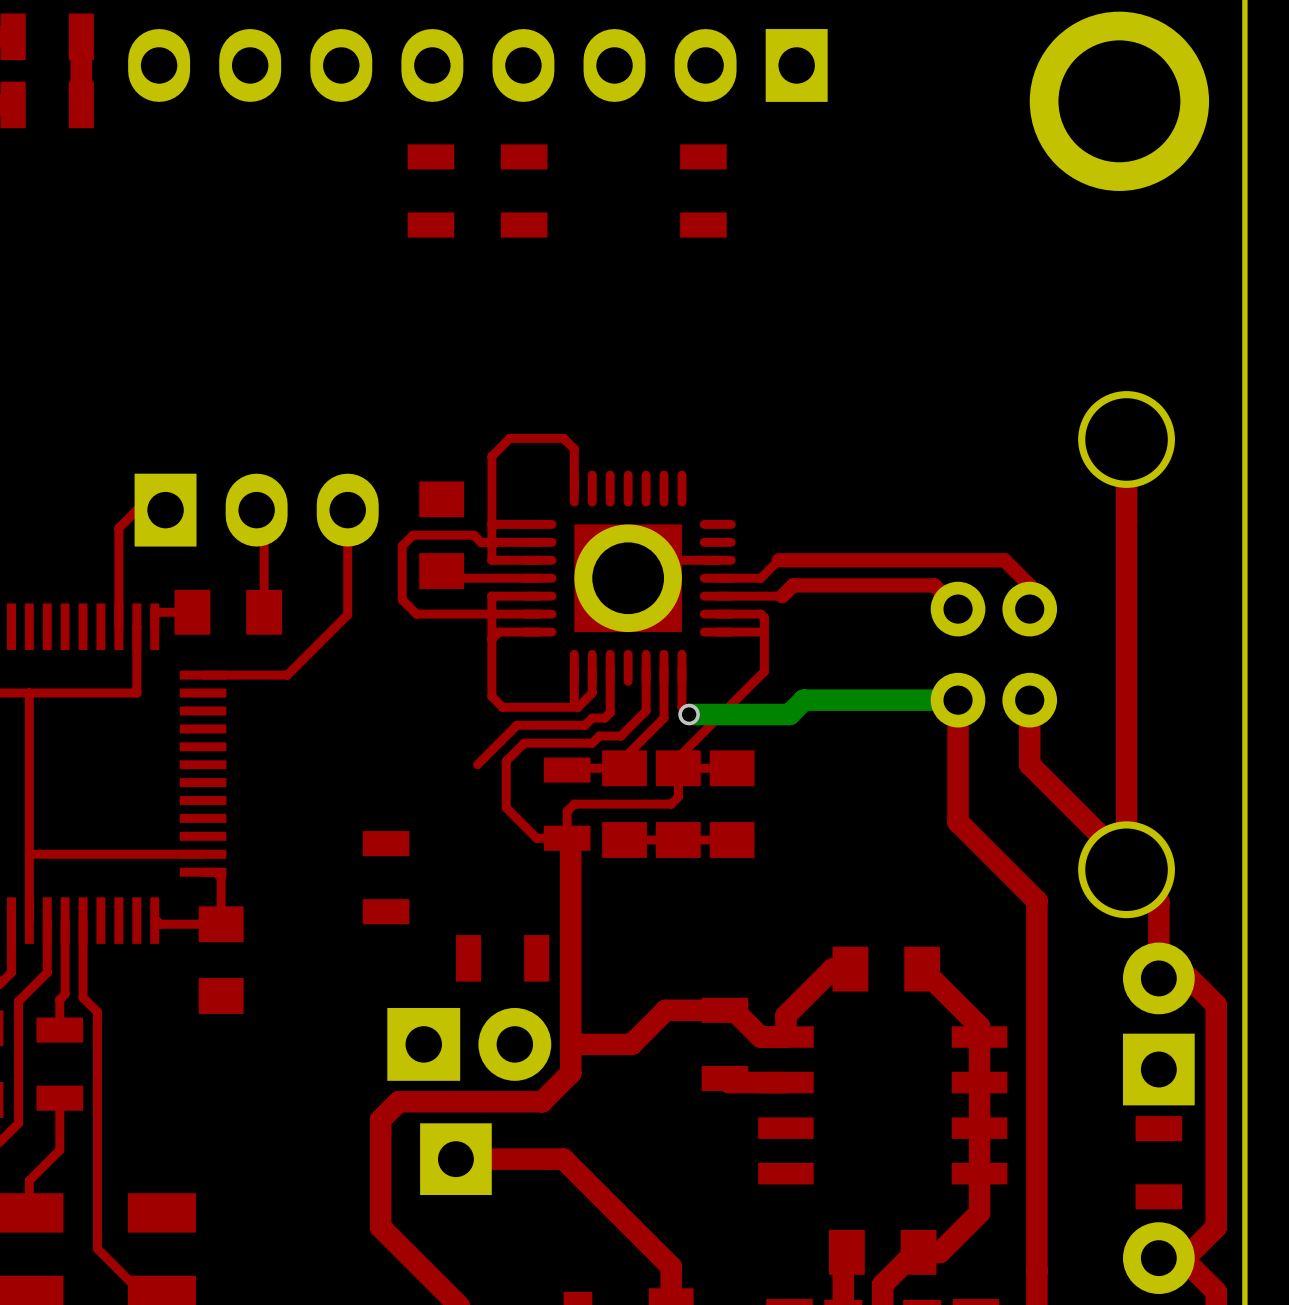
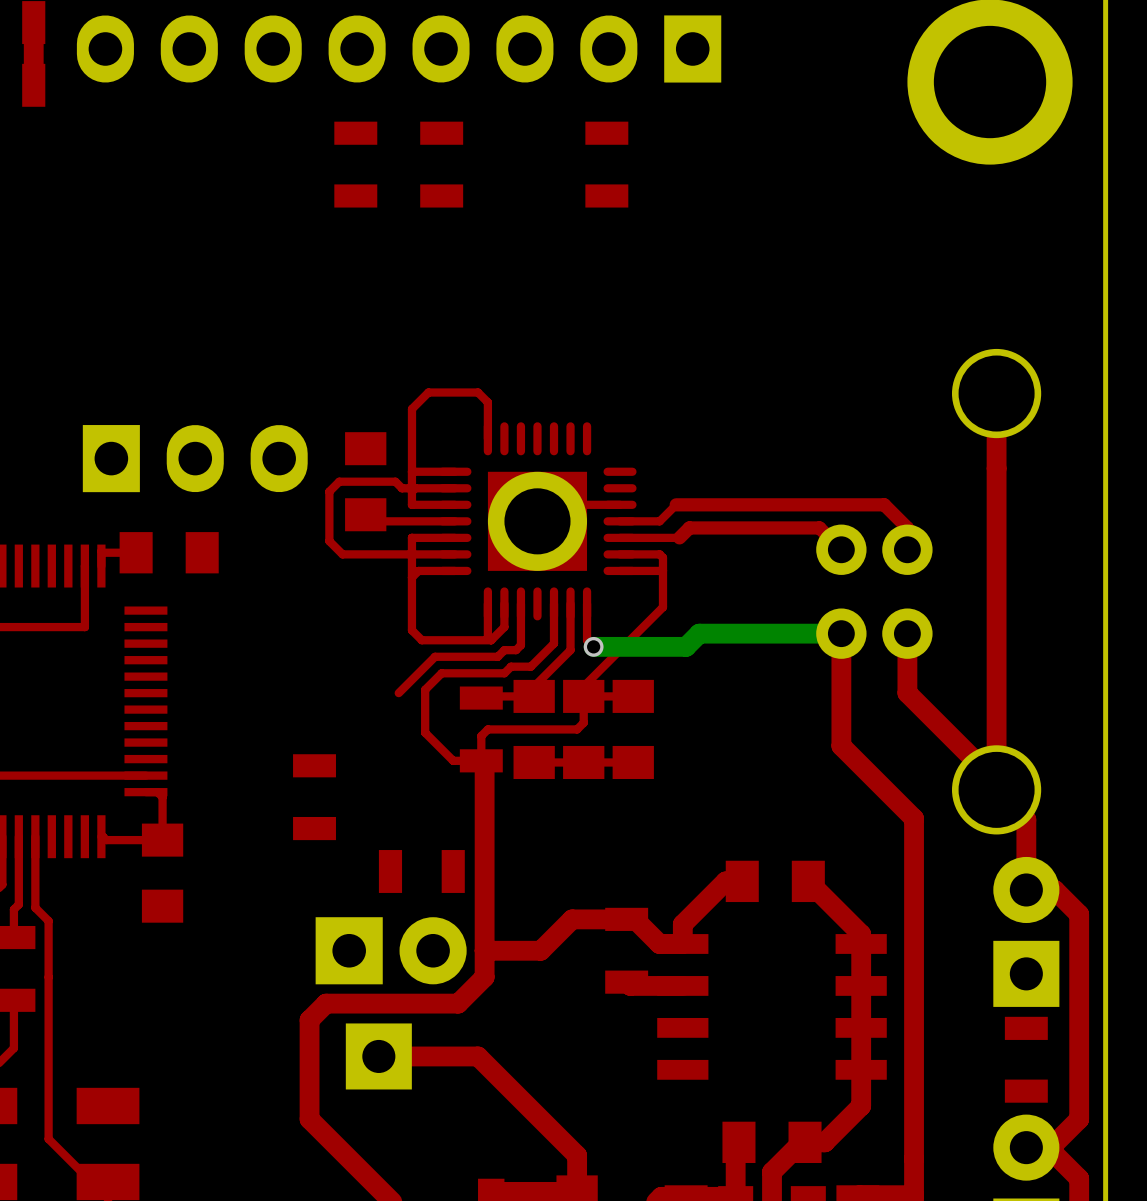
top track: (165, 510) (136, 510) (118, 528) (118, 626) -> none
top track: (256, 510) (264, 517) (264, 612) -> none
top track: (347, 510) (347, 614) (287, 675) (203, 675) -> none

